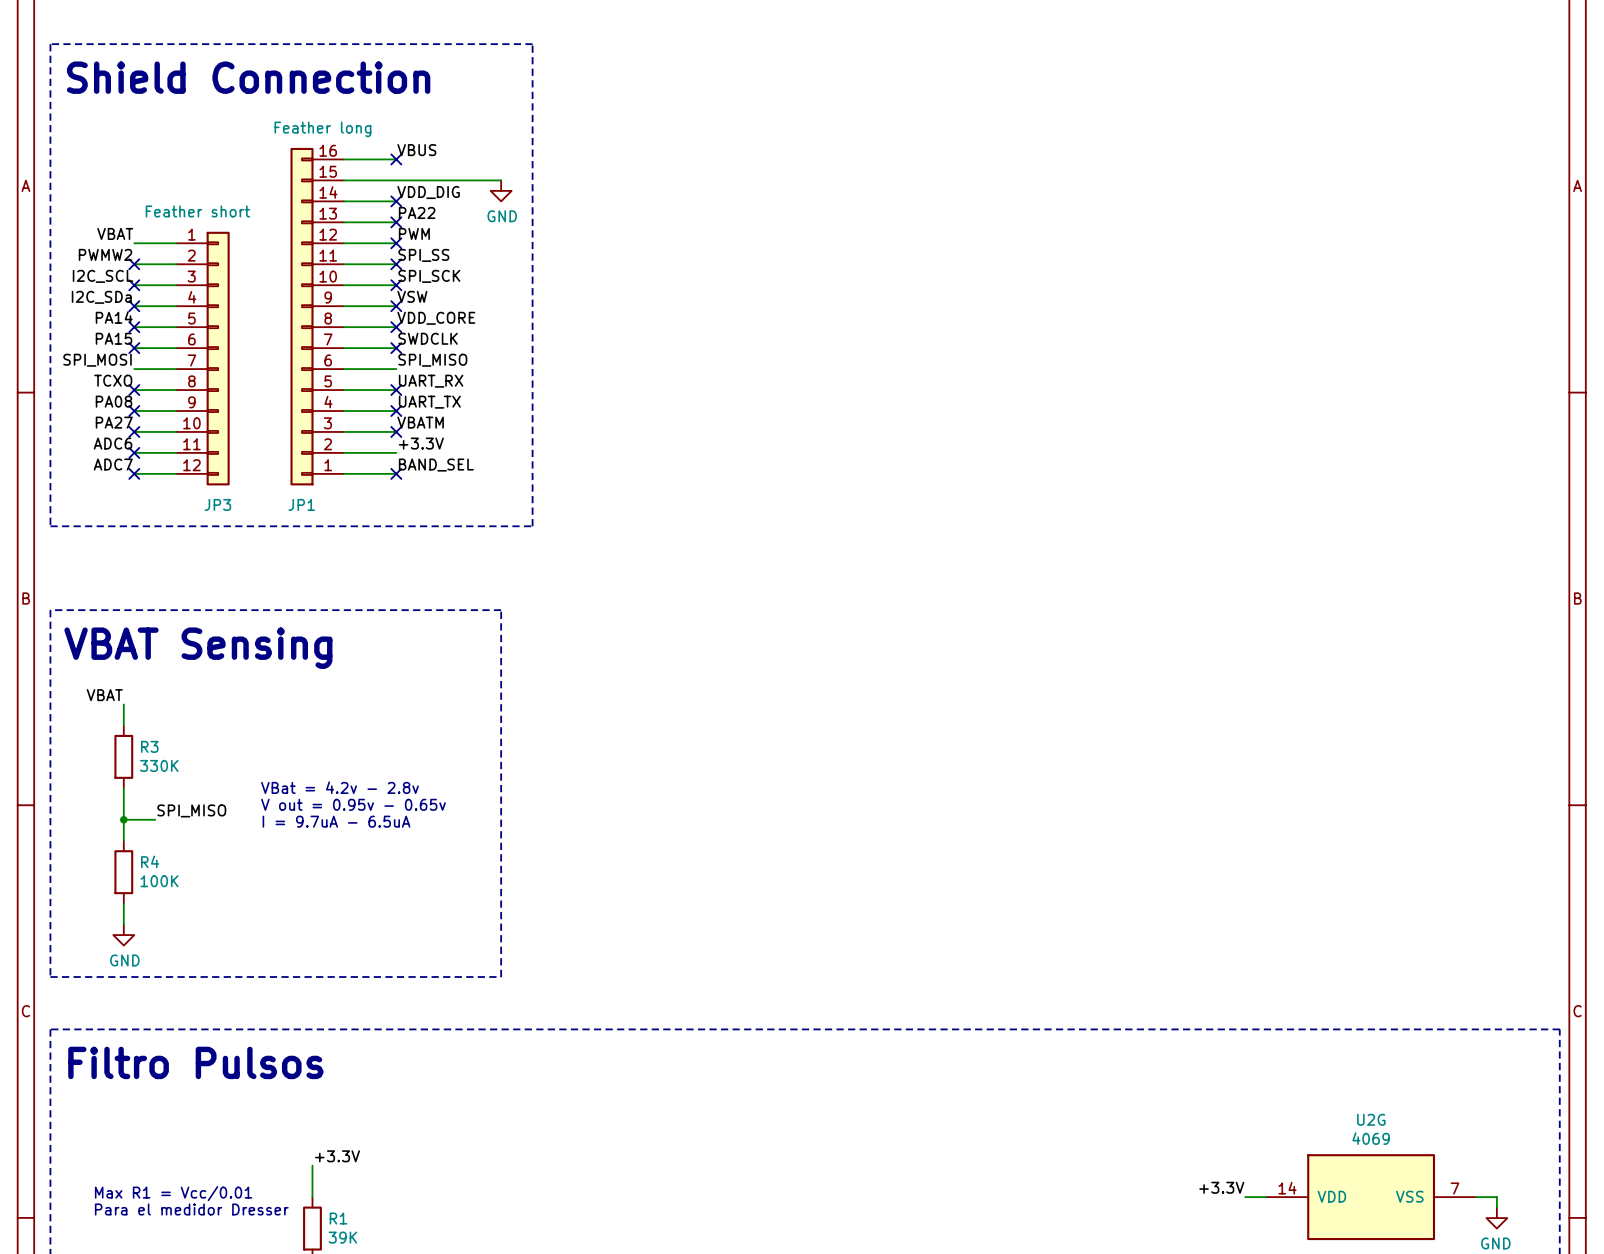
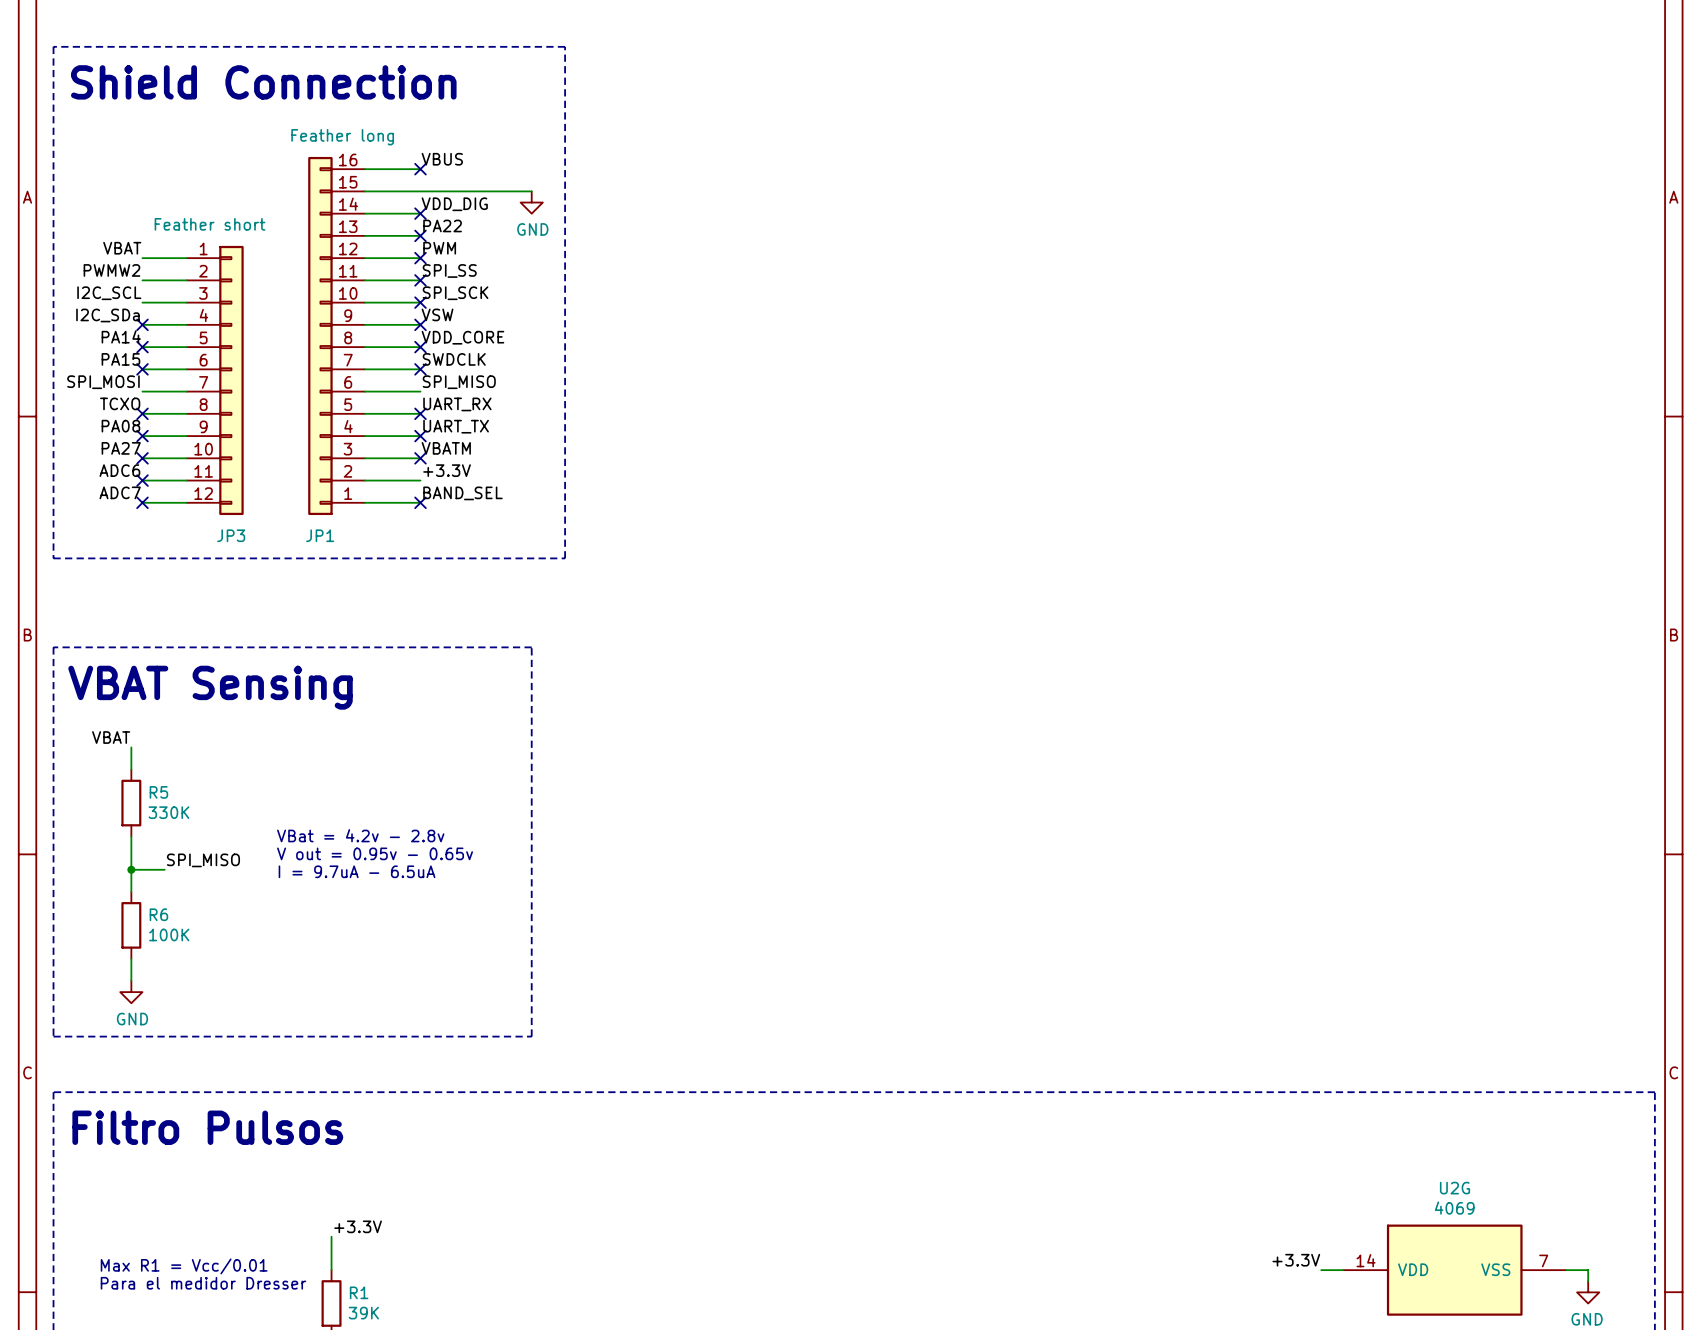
no-connect mark: (134, 264) -> none
no-connect mark: (134, 285) -> none
R3 name: R3 (149, 746) -> R5 (158, 792)
R4 name: R4 (150, 861) -> R6 (158, 914)

